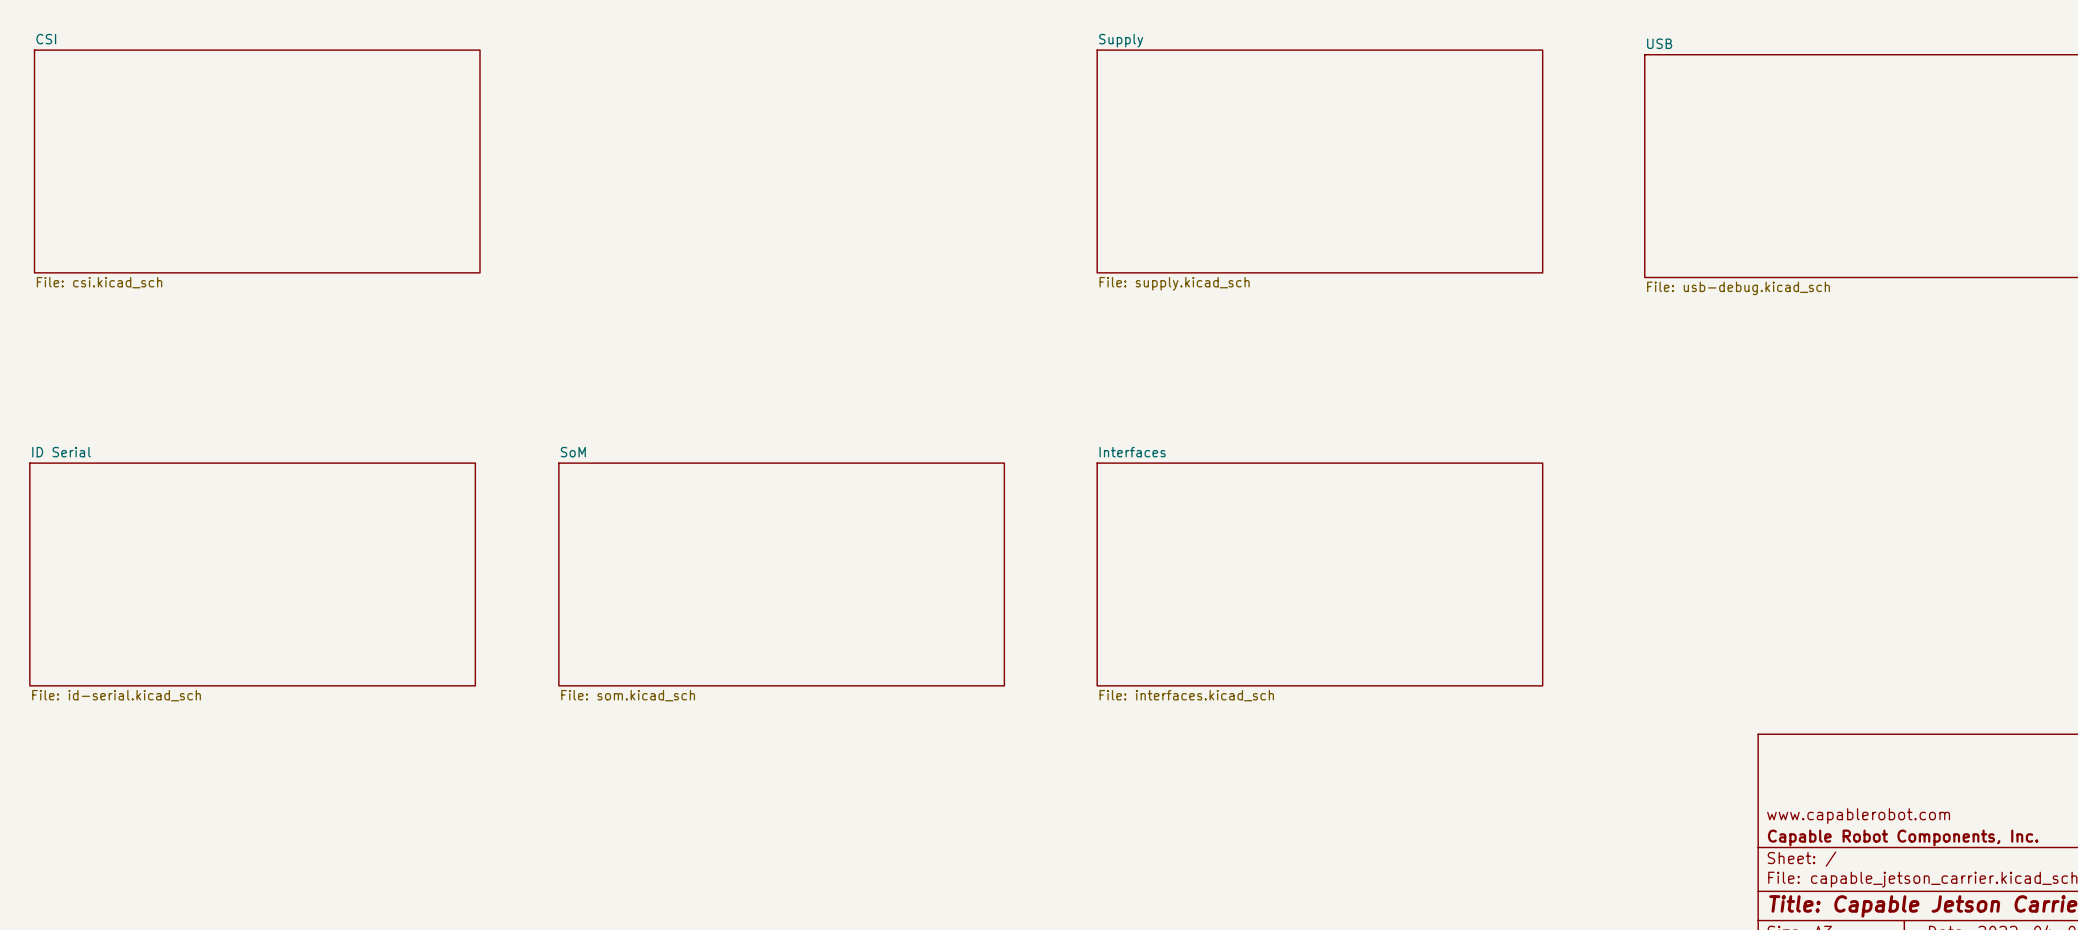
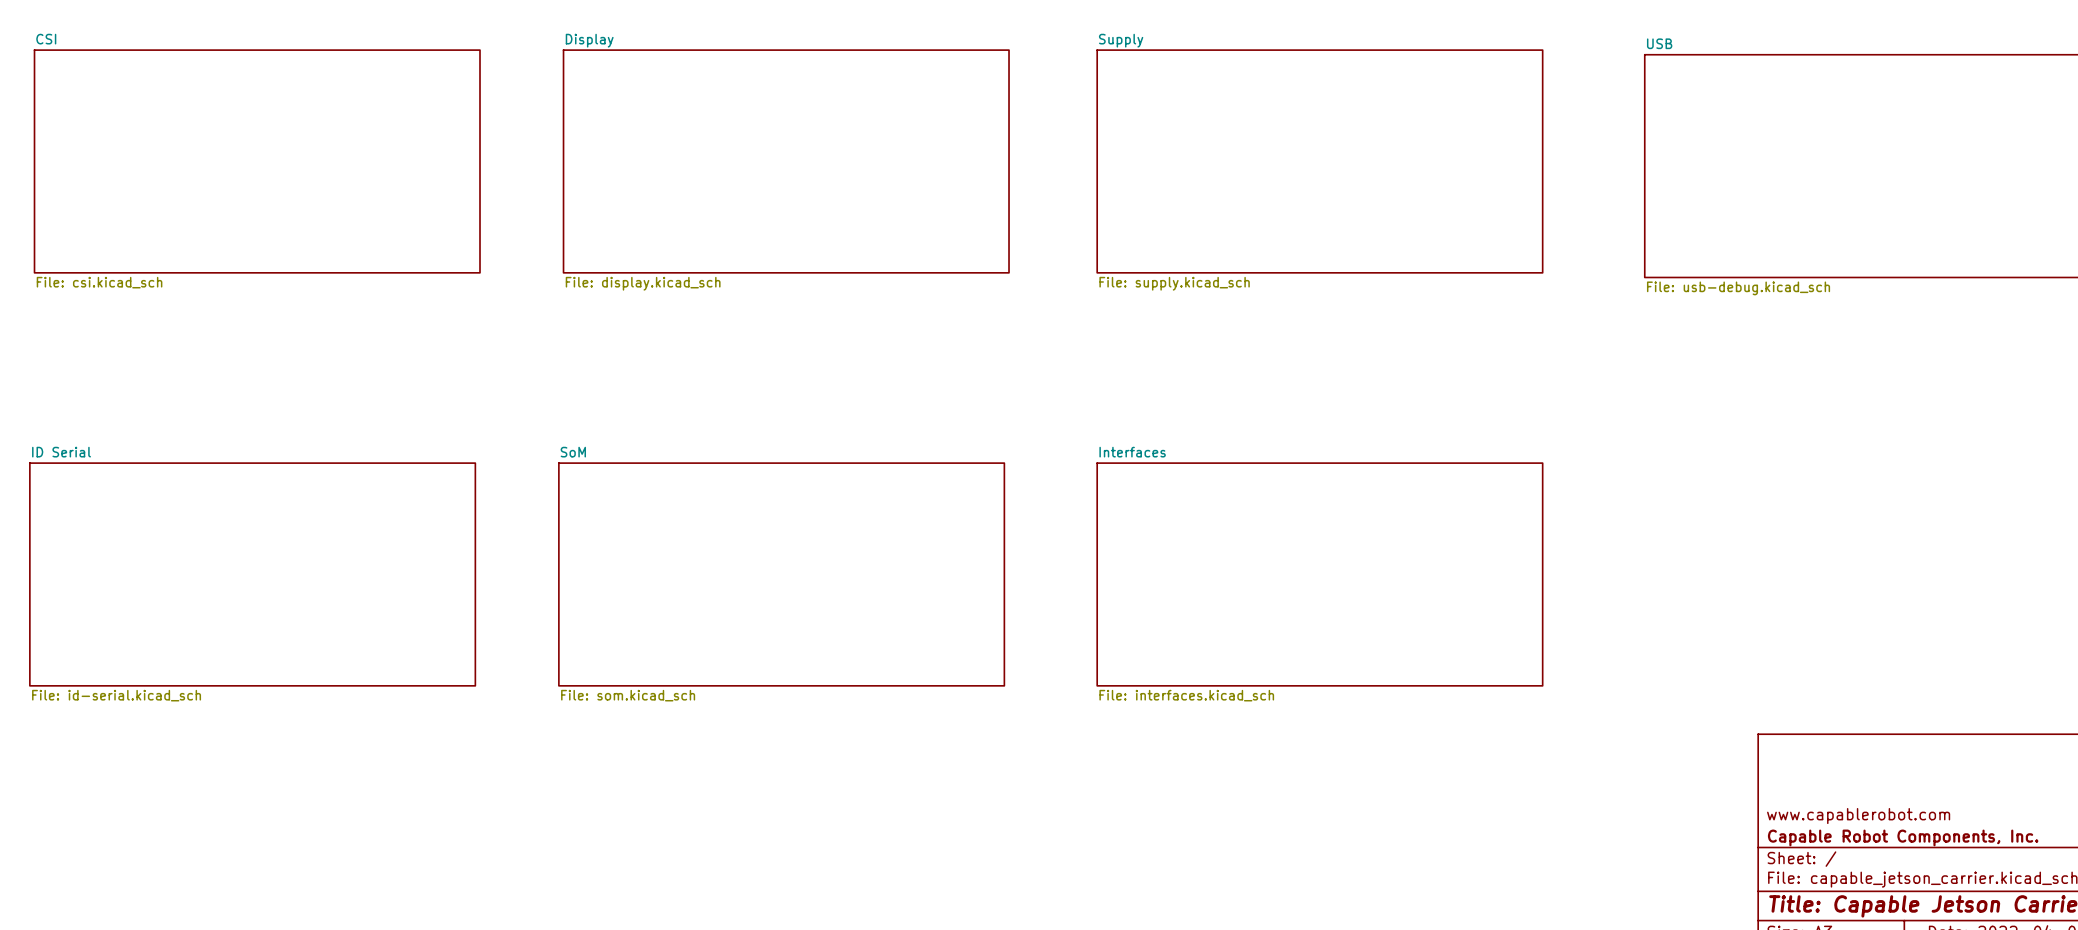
sheet Display: none -> File: display.kicad_sch (786, 161)

